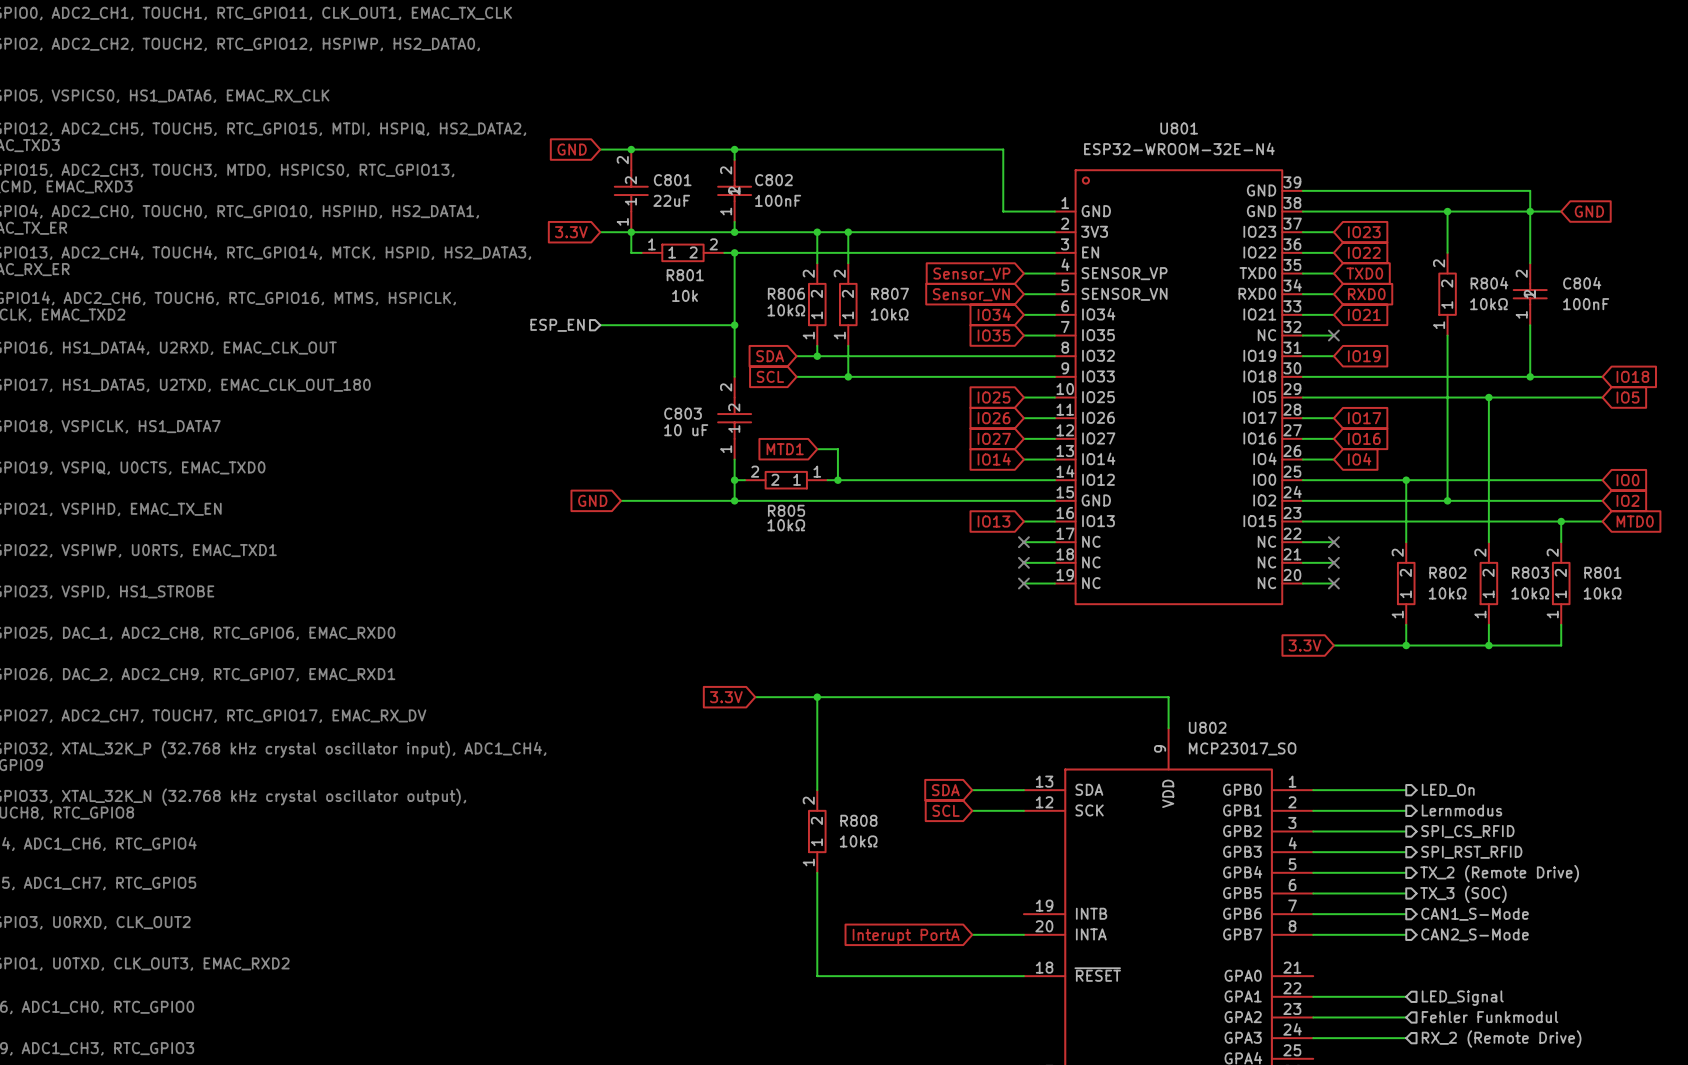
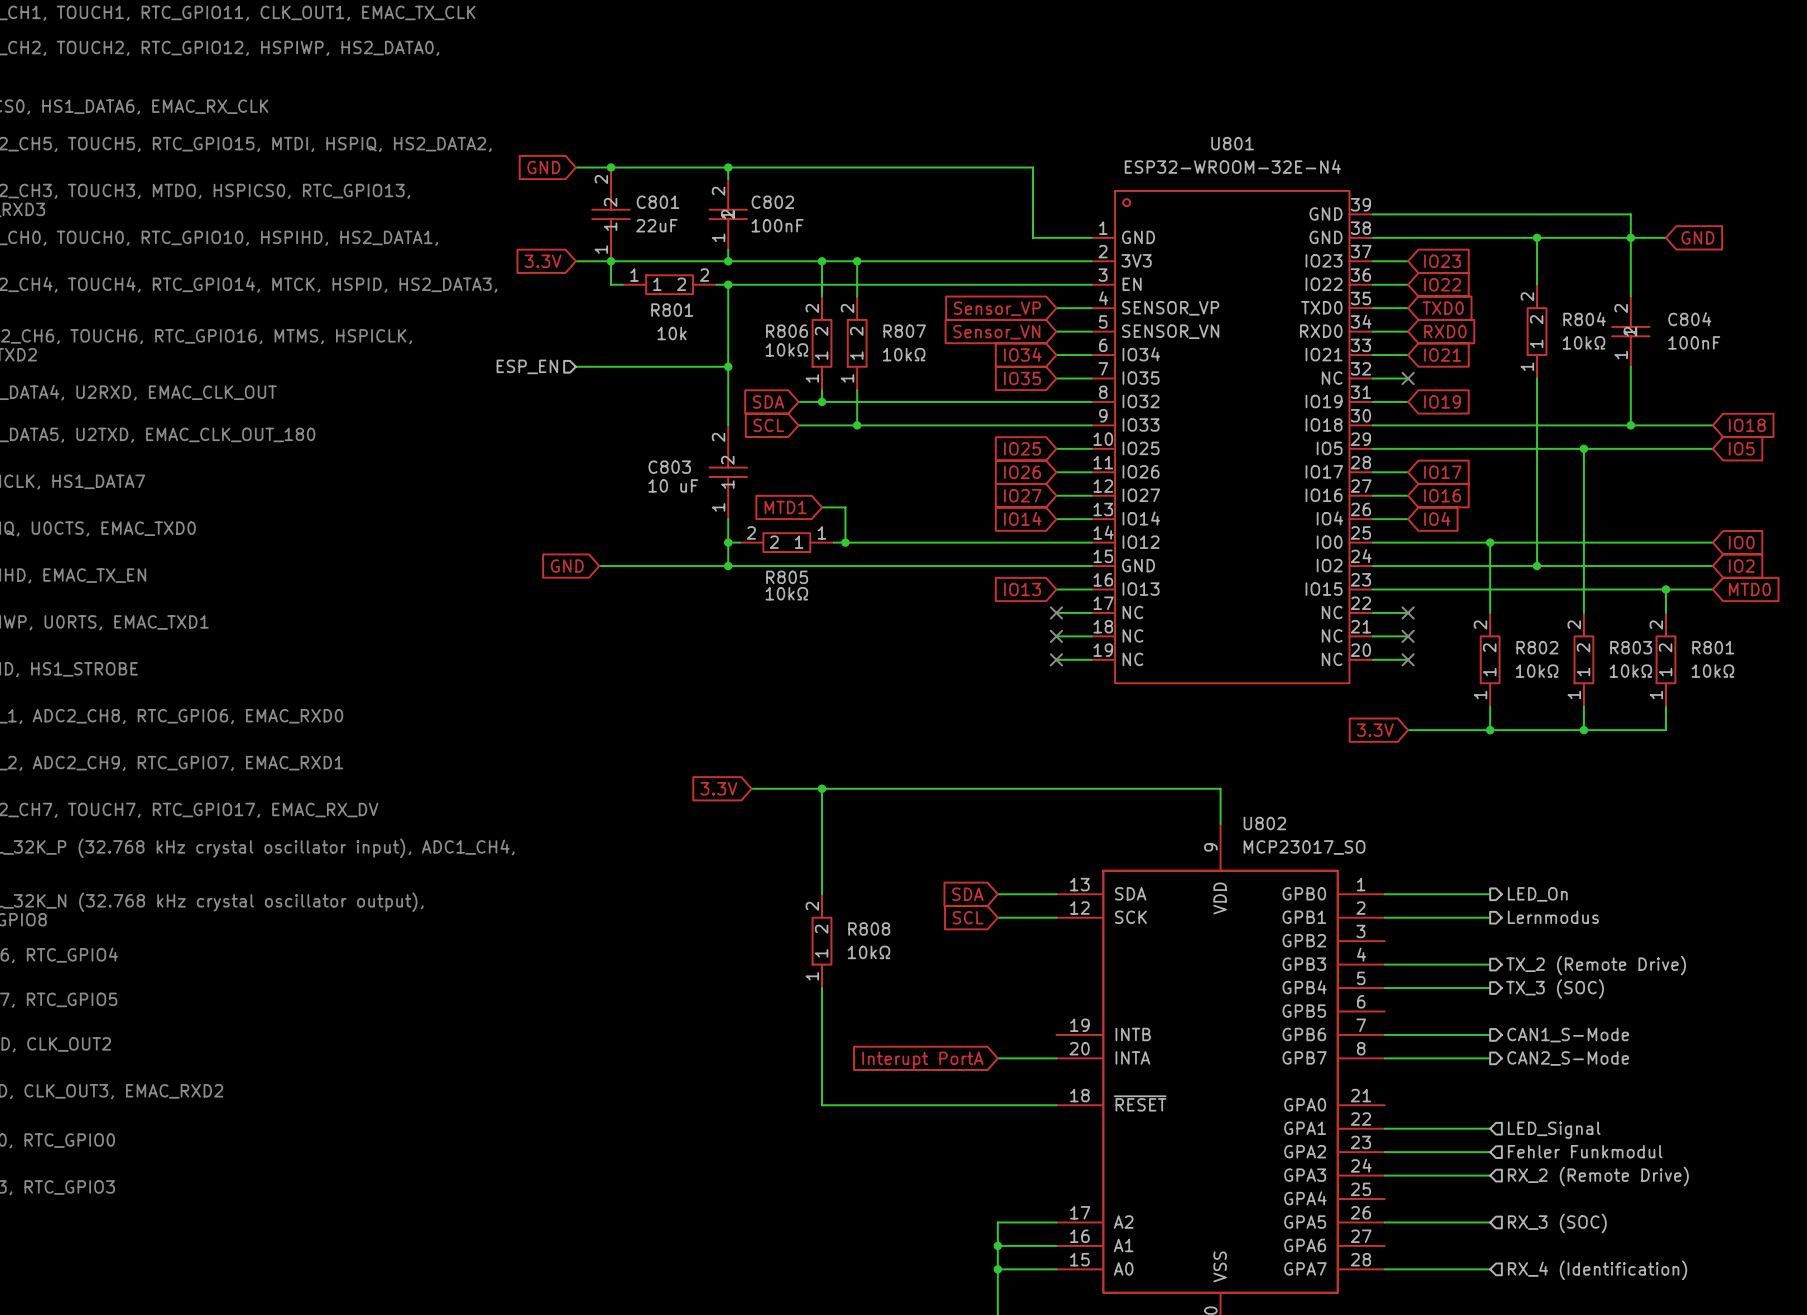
wire: (1313, 831) (1406, 831) -> none
hierarchical label: SPI_CS_RFID (1467, 831) -> none
hierarchical label: SPI_RST_RFID (1471, 852) -> TX_2 (Remote Drive) (1596, 965)
hierarchical label: TX_2 (Remote Drive) (1499, 873) -> TX_3 (SOC) (1555, 988)
wire: (1313, 893) (1406, 893) -> none
hierarchical label: TX_3 (SOC) (1463, 894) -> none

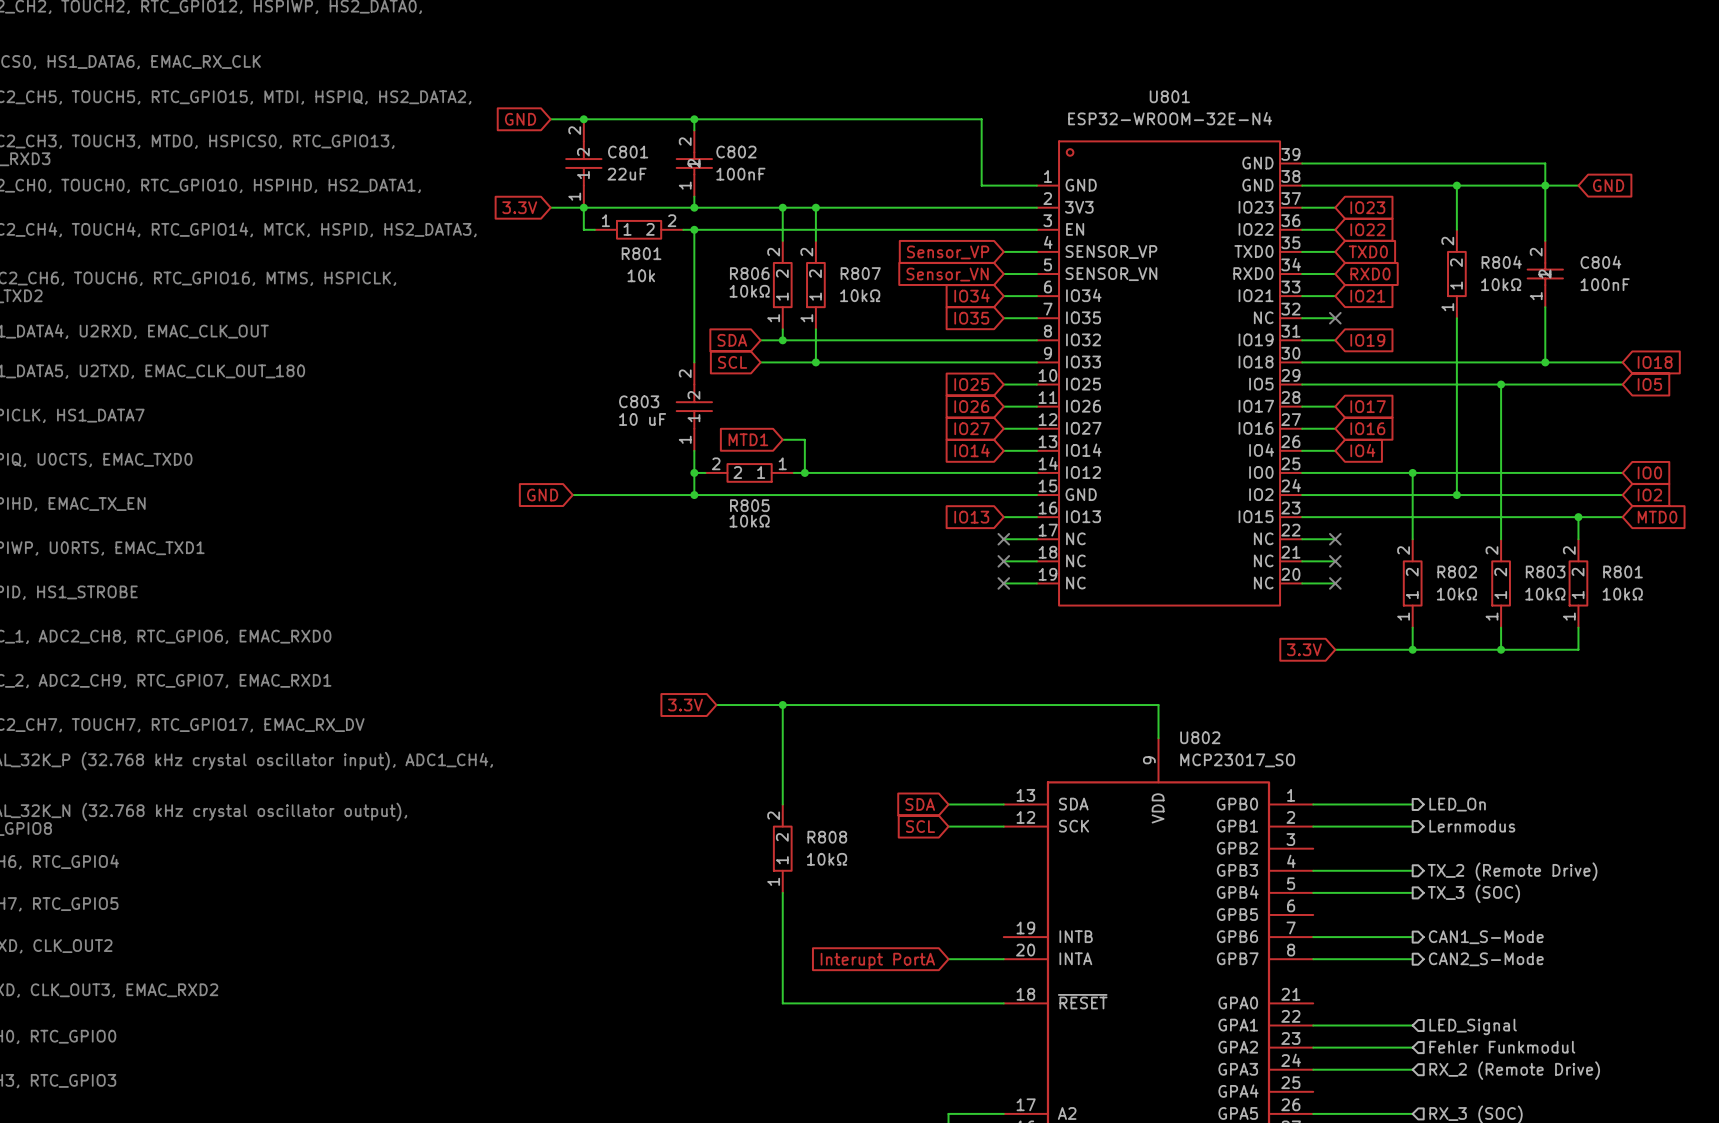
hierarchical label: ESP_EN (527, 366) -> none
wire: (575, 366) (728, 366) -> none
junction: (728, 366) -> none

